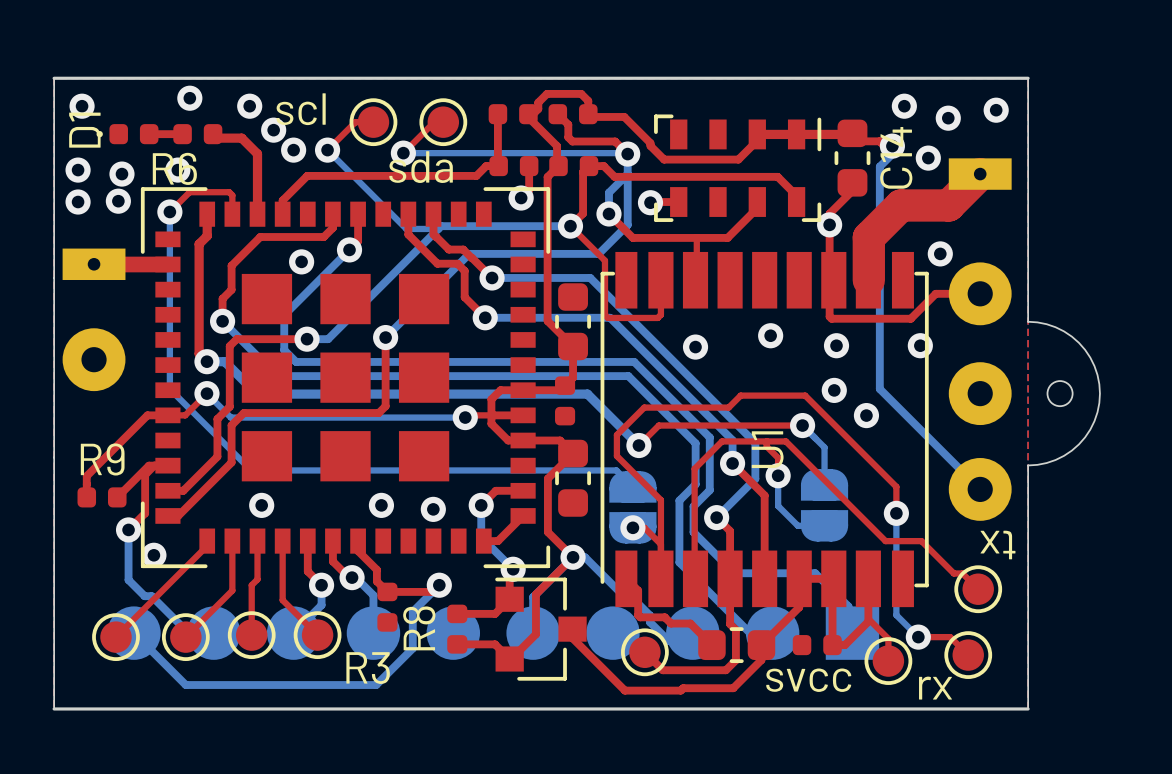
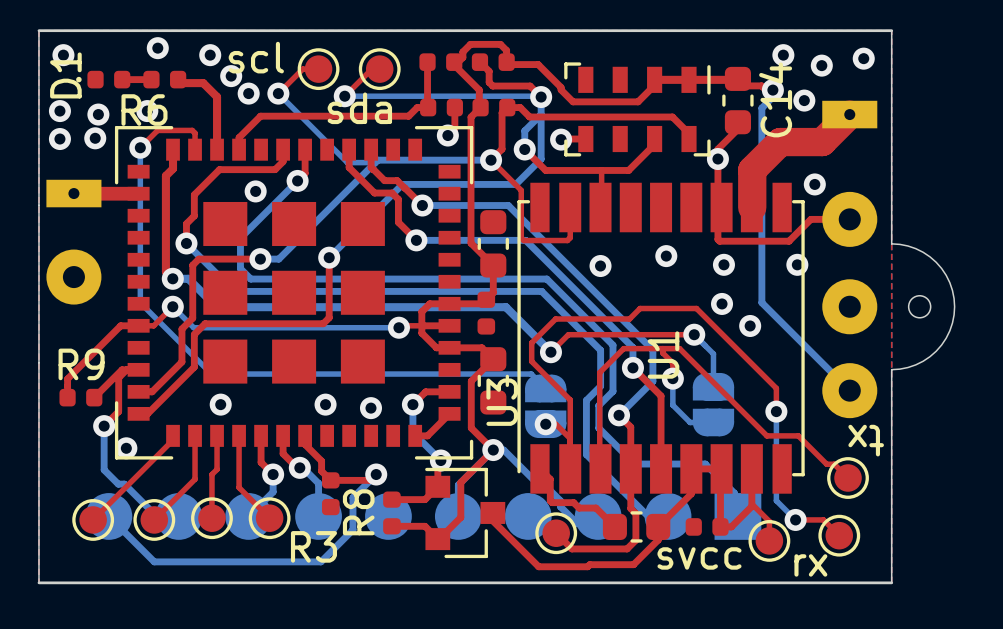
U3 name: none -> U3 (502, 402)

